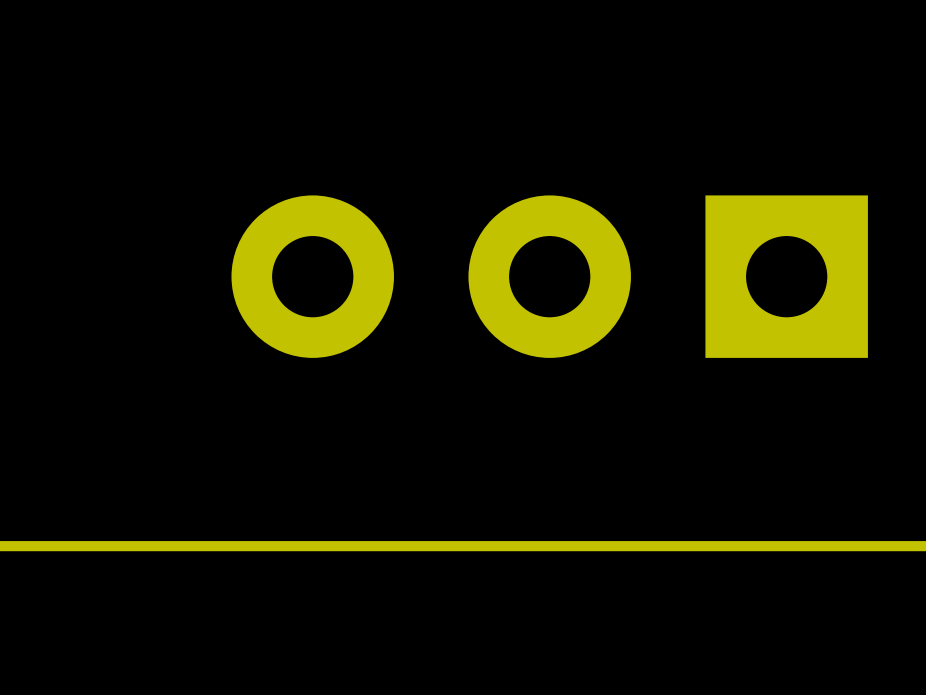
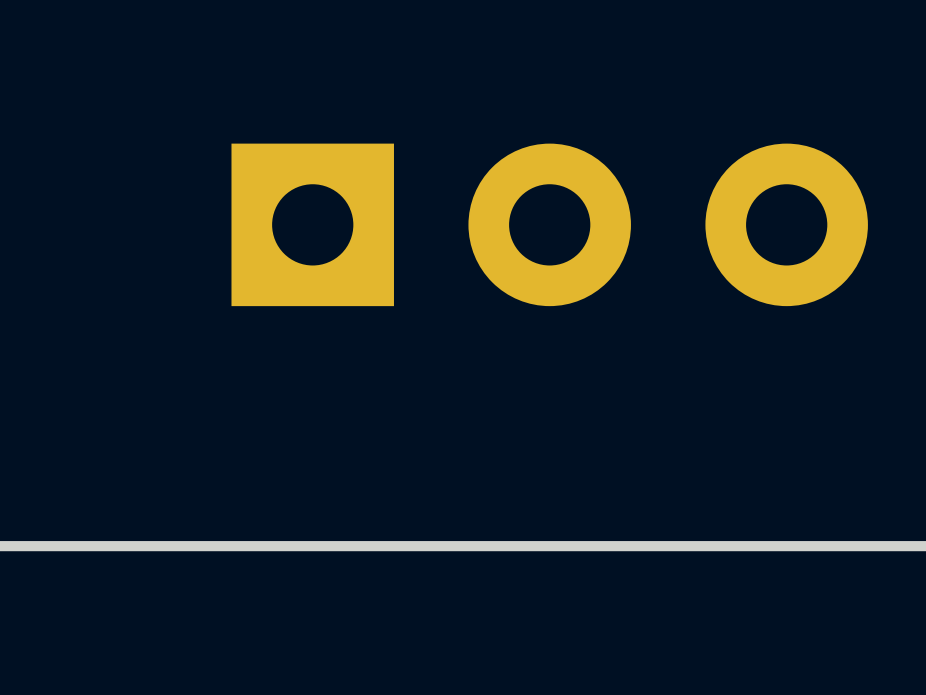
part rotation: 0° (549, 276) -> 180° (549, 224)

